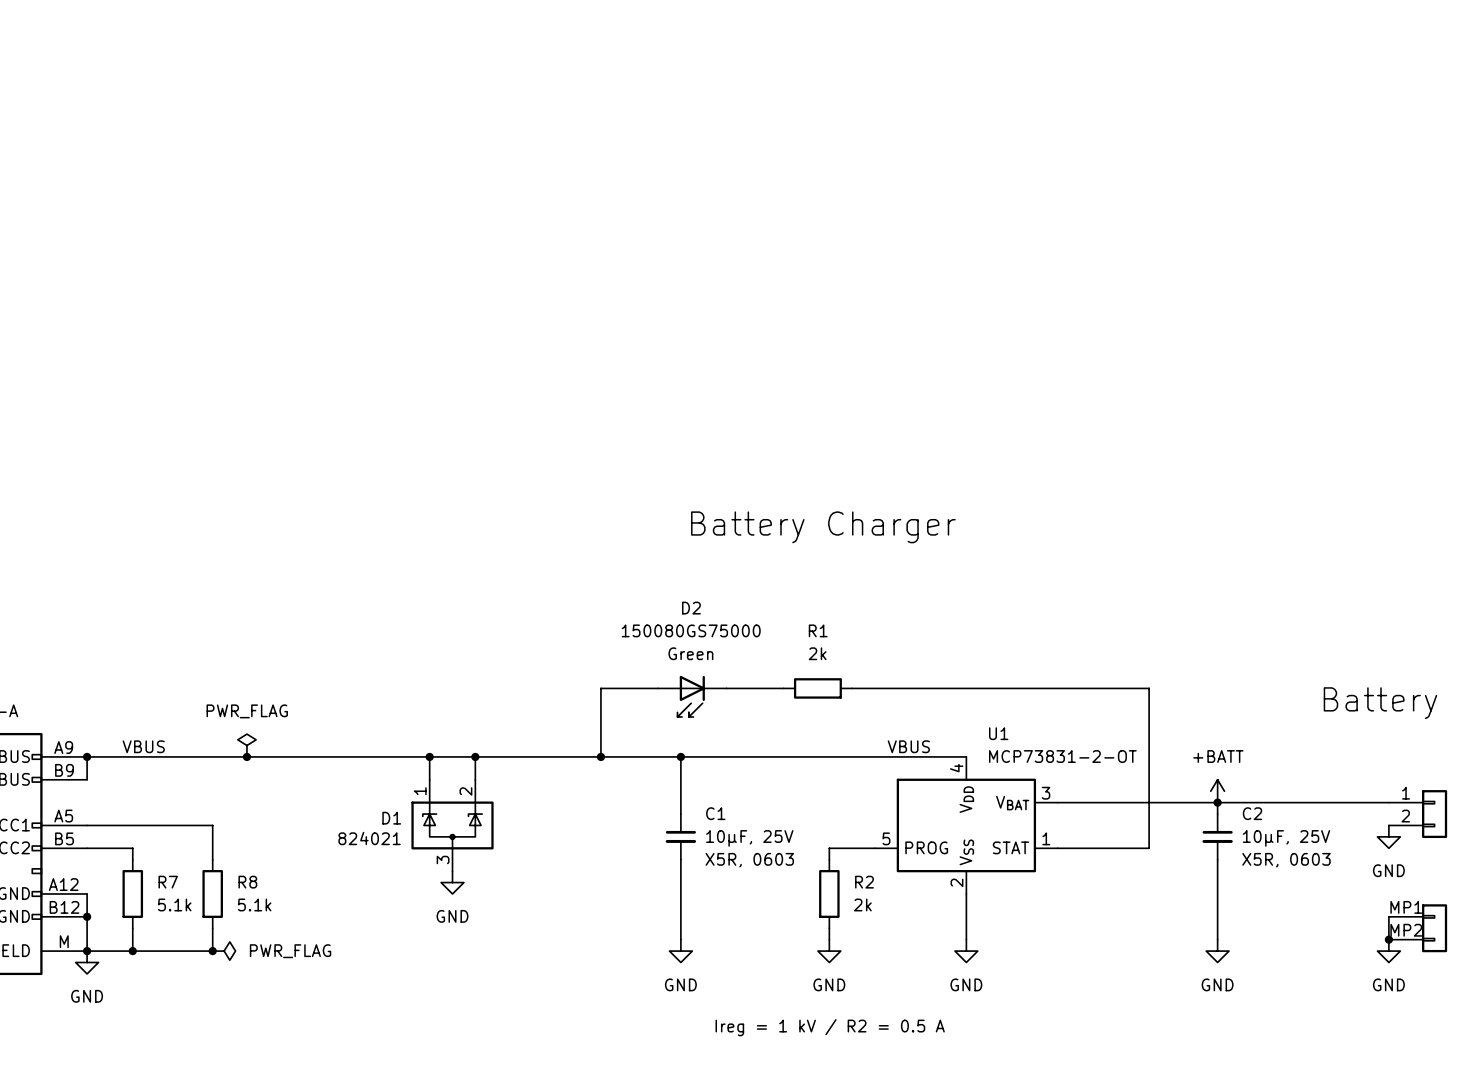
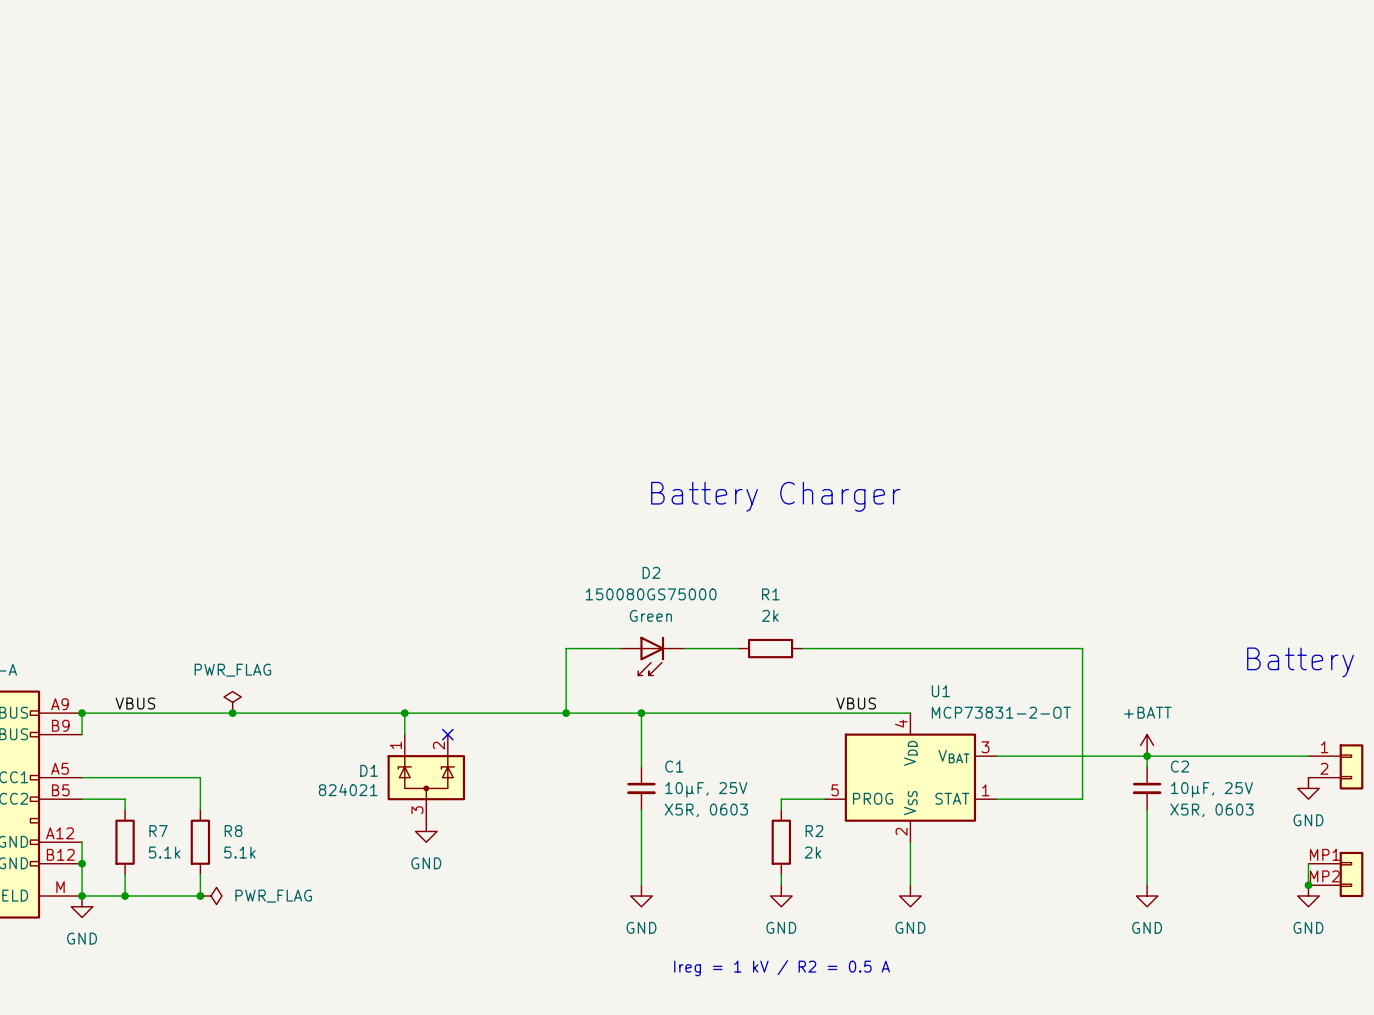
wire: (475, 756) (475, 779) -> none
junction: (475, 756) -> none
no-connect mark: none -> (447, 734)

